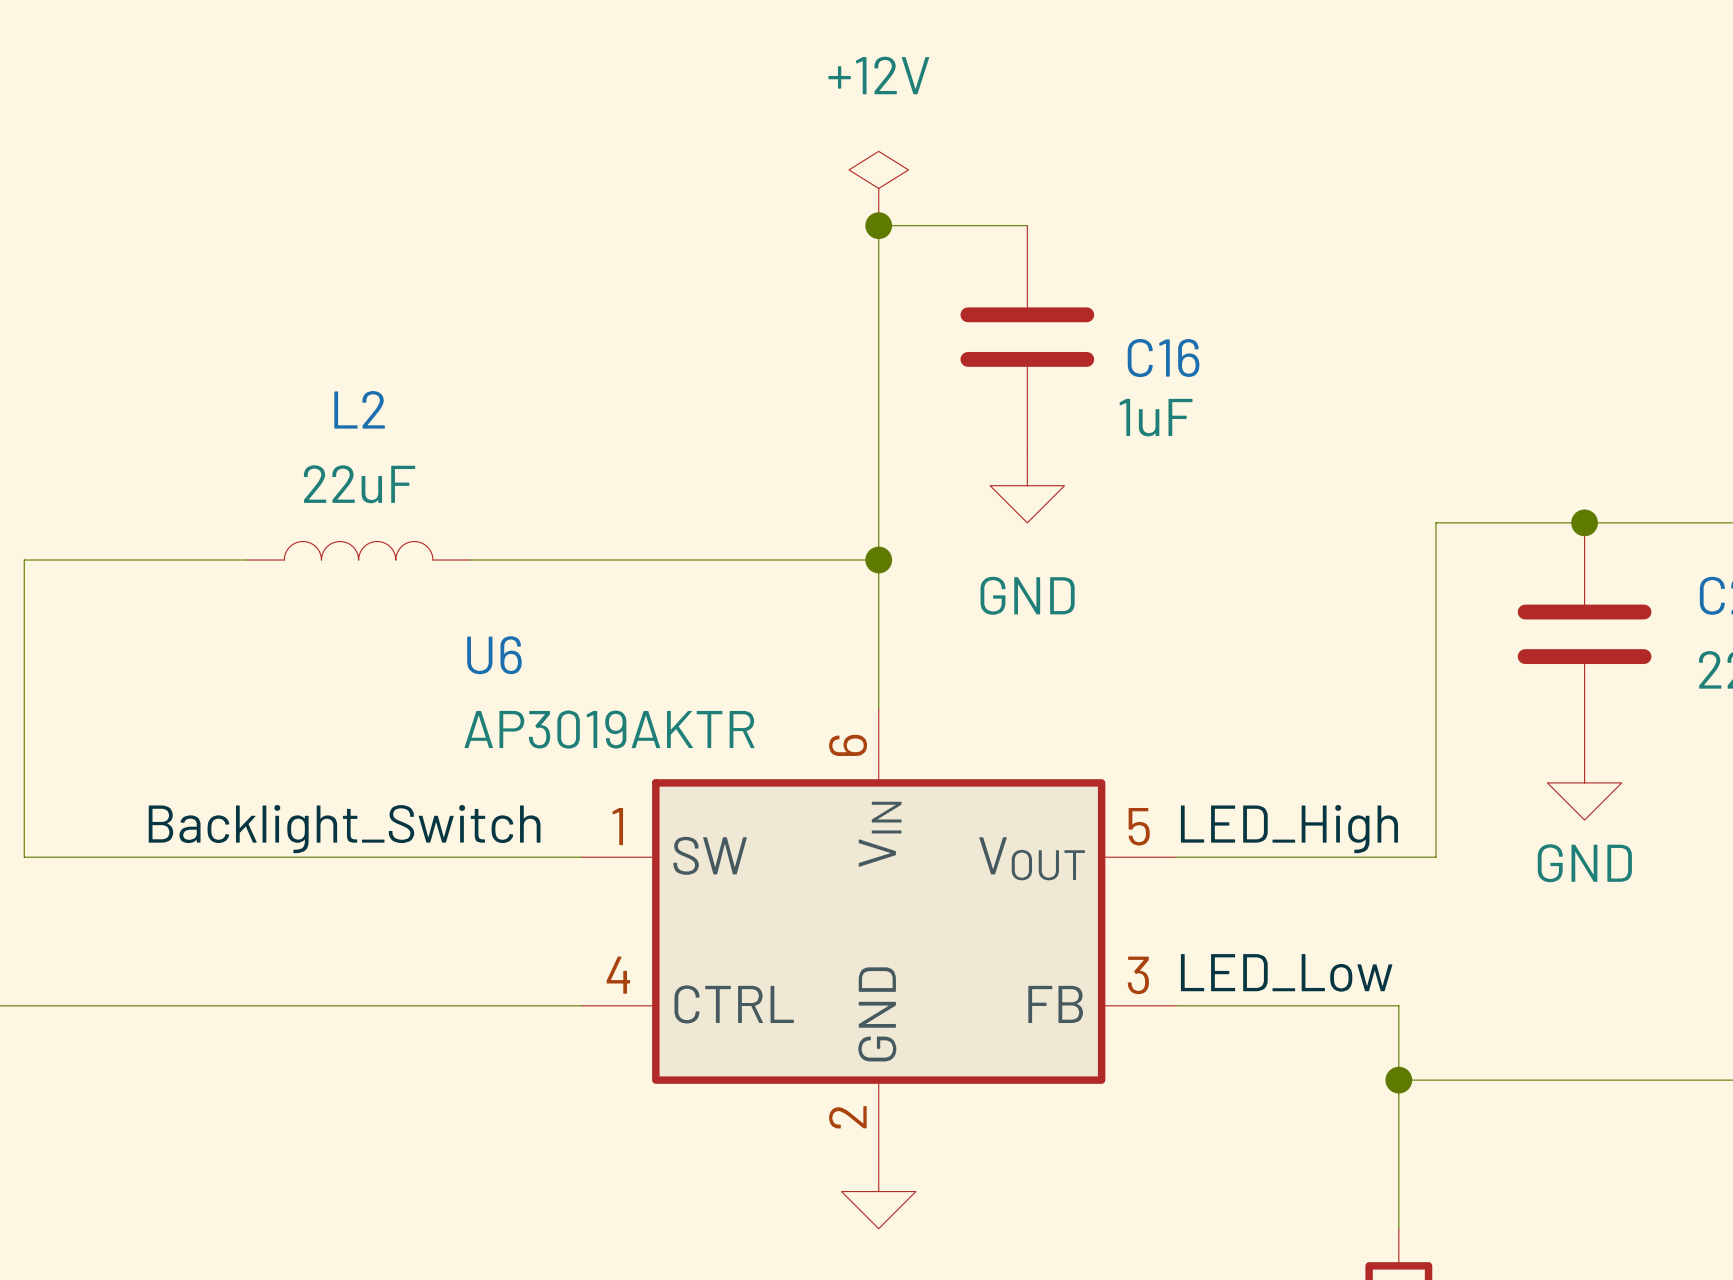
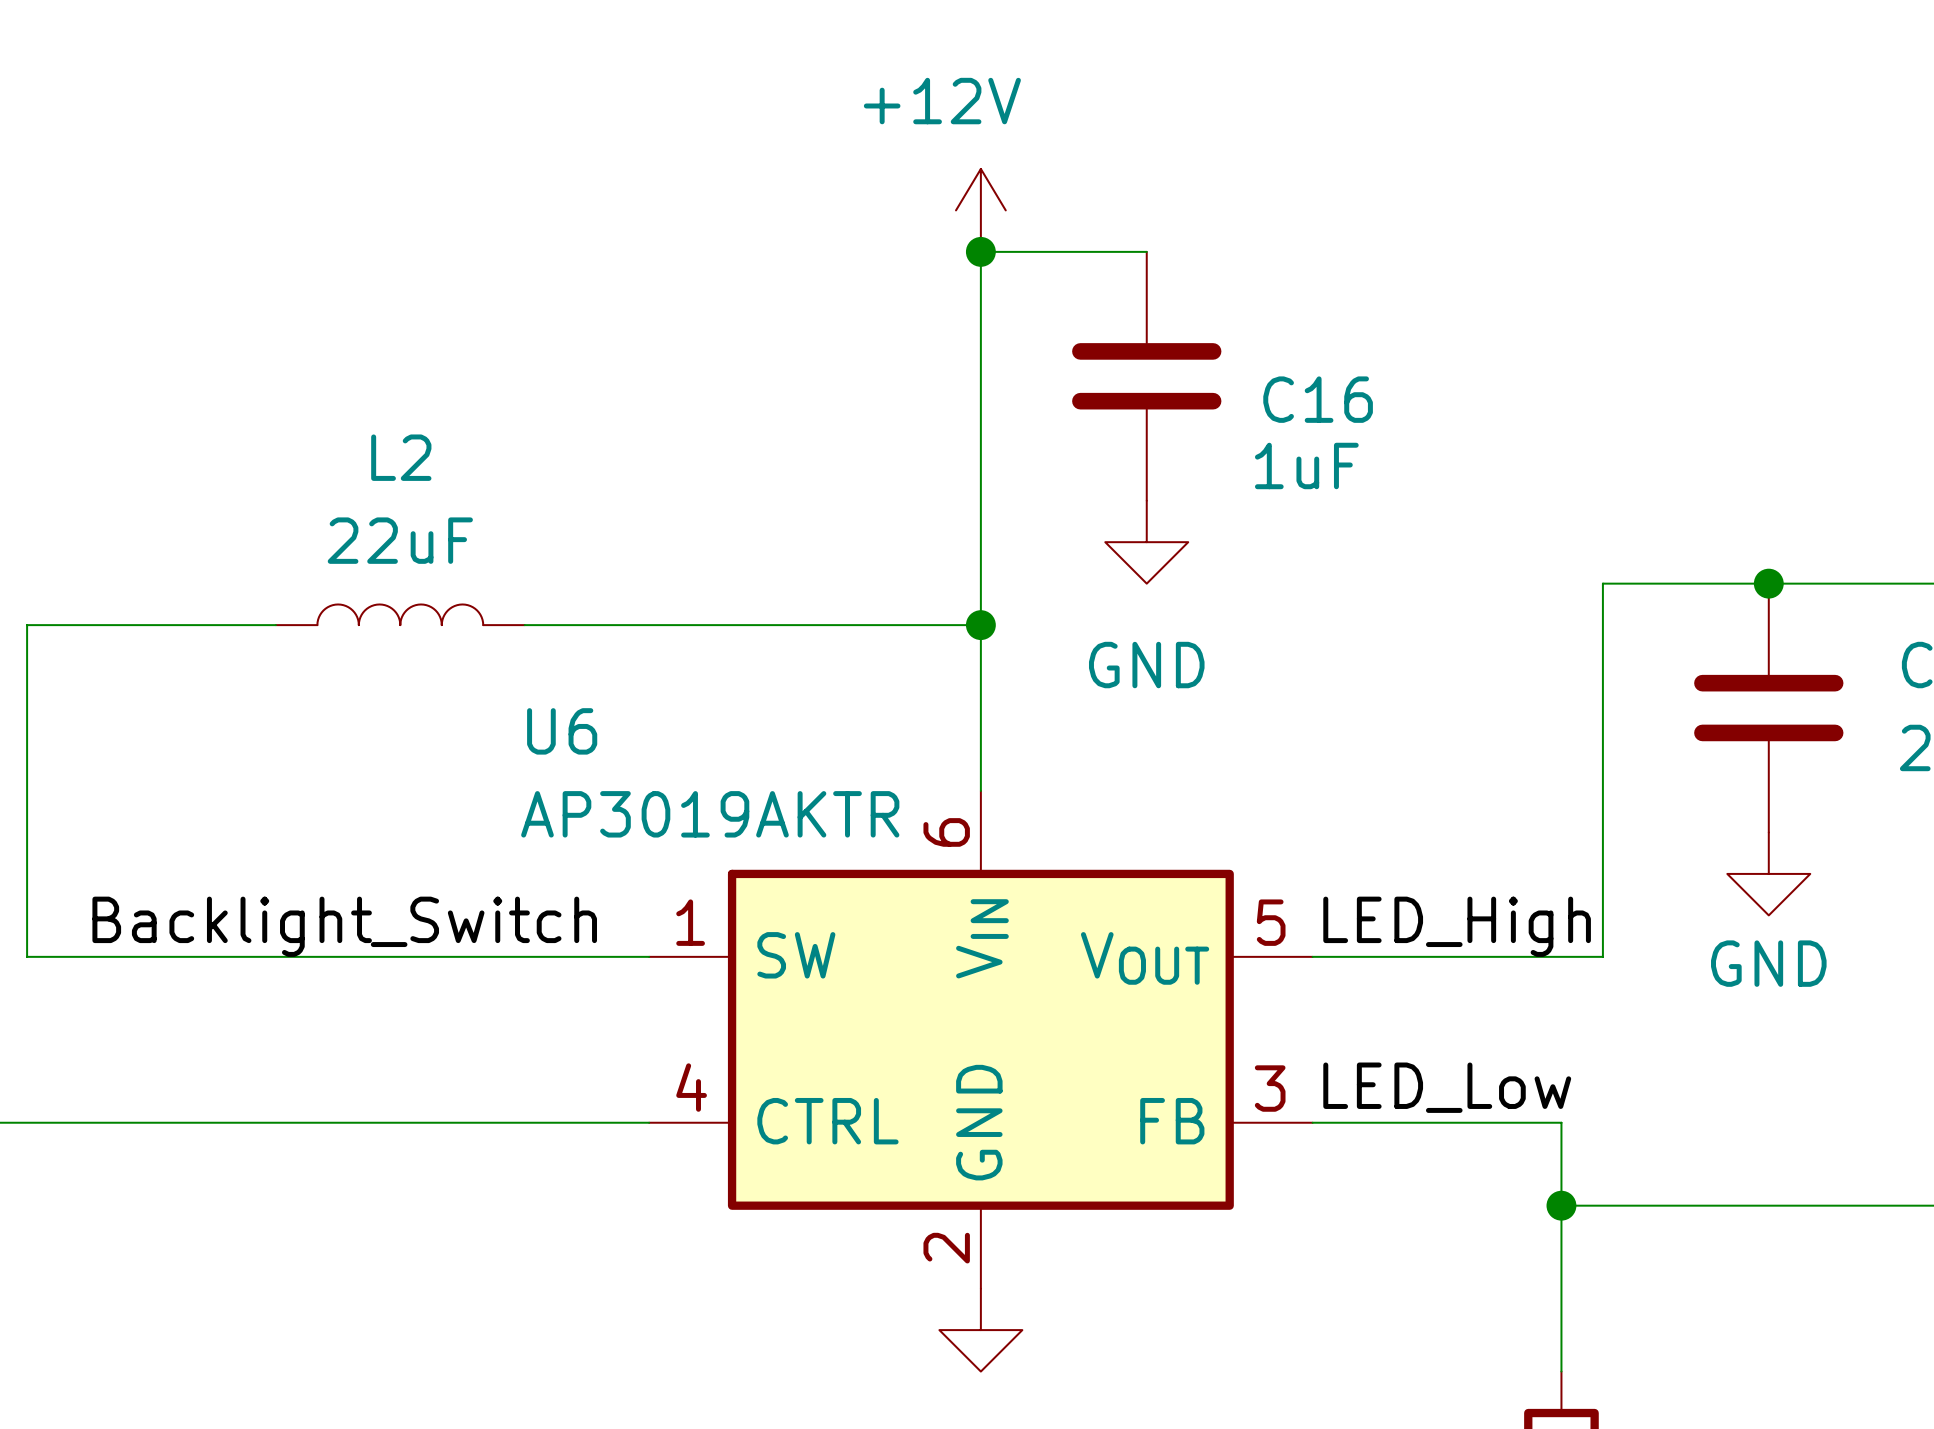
power symbol text position: +12V (878, 75) -> +12V (942, 101)
power symbol shape: [849, 151, 909, 226] -> [956, 168, 1006, 252]

